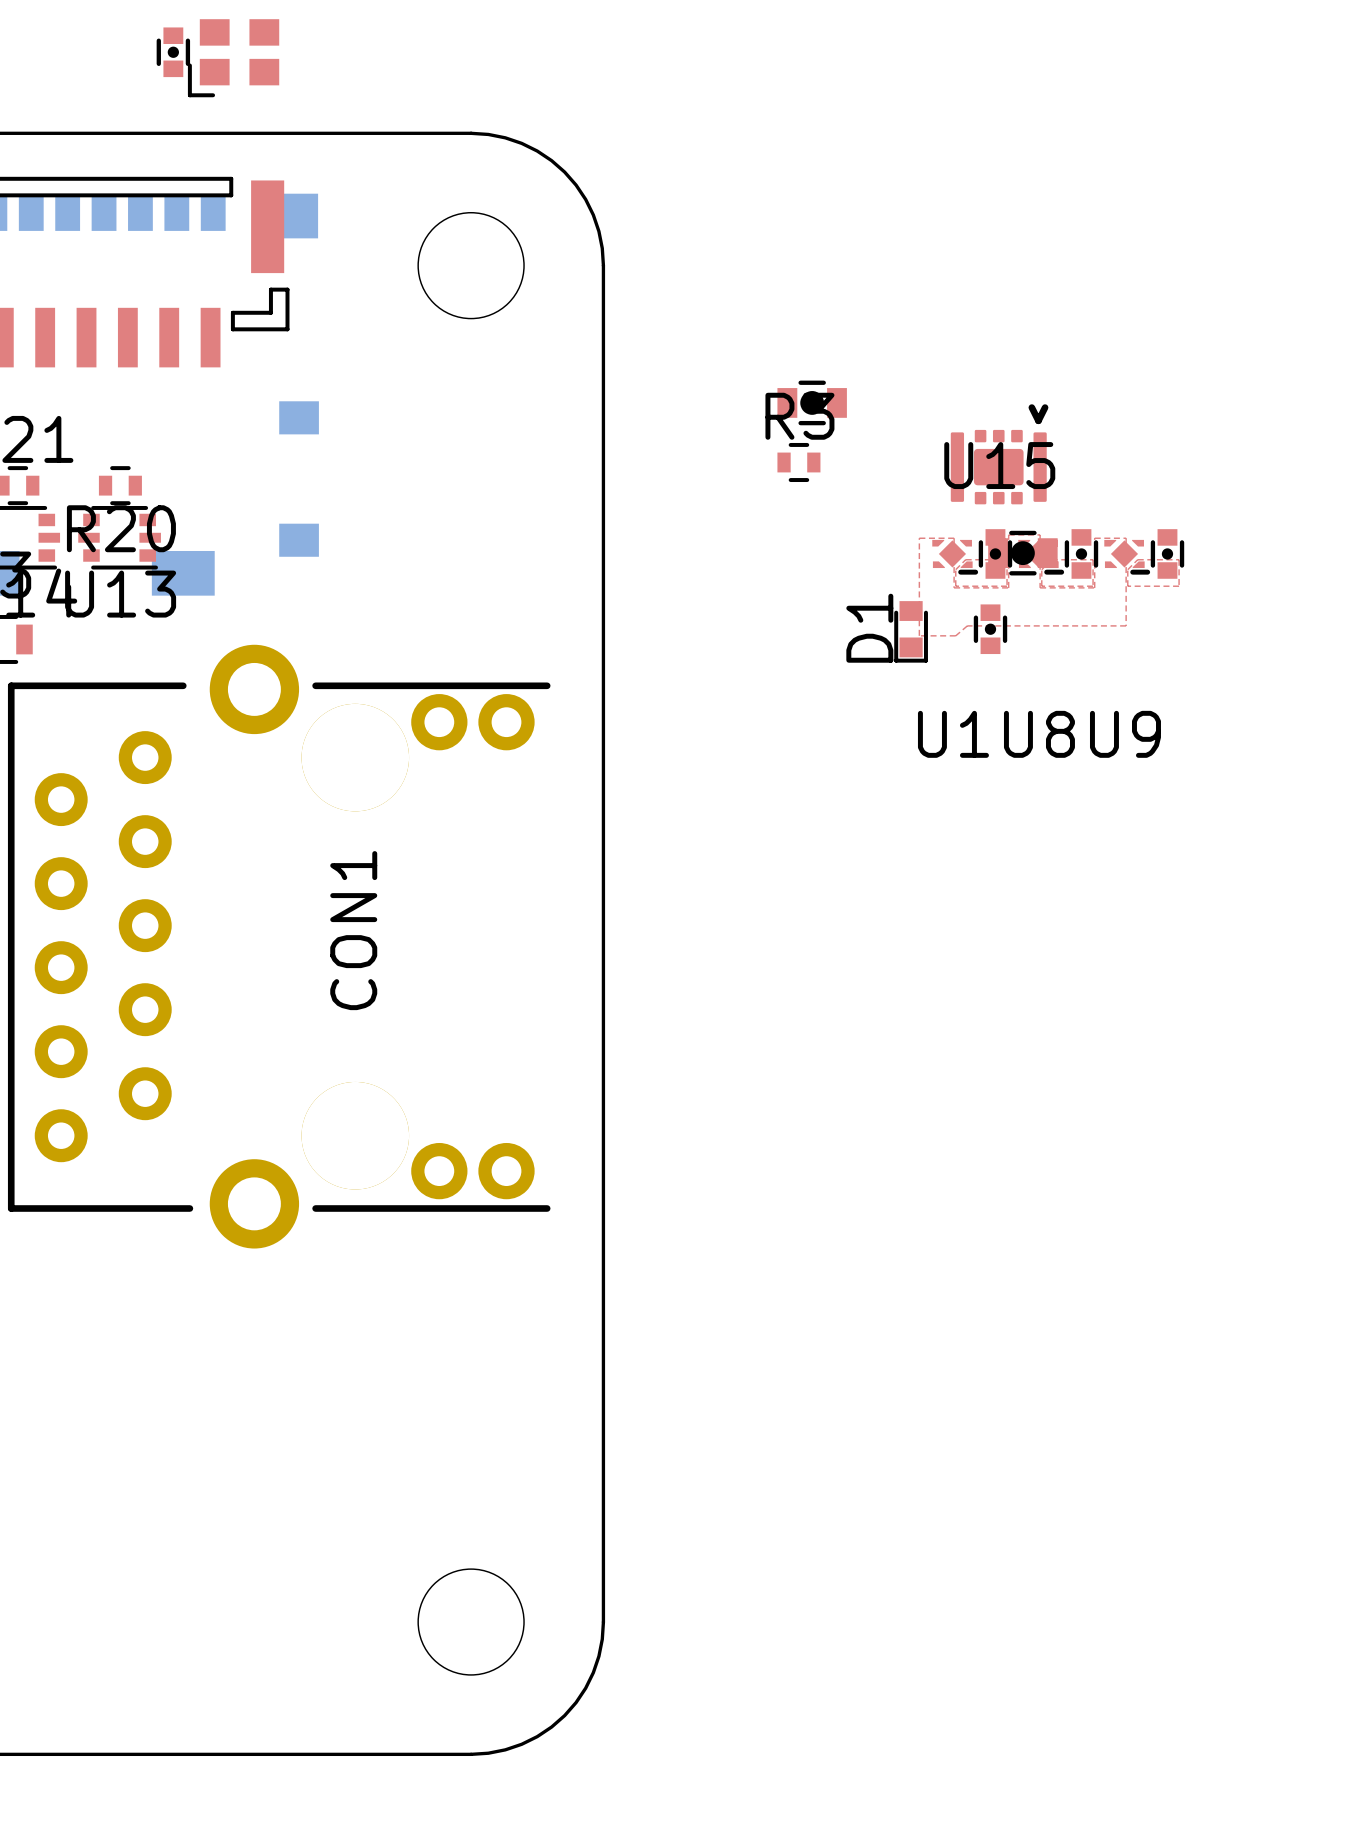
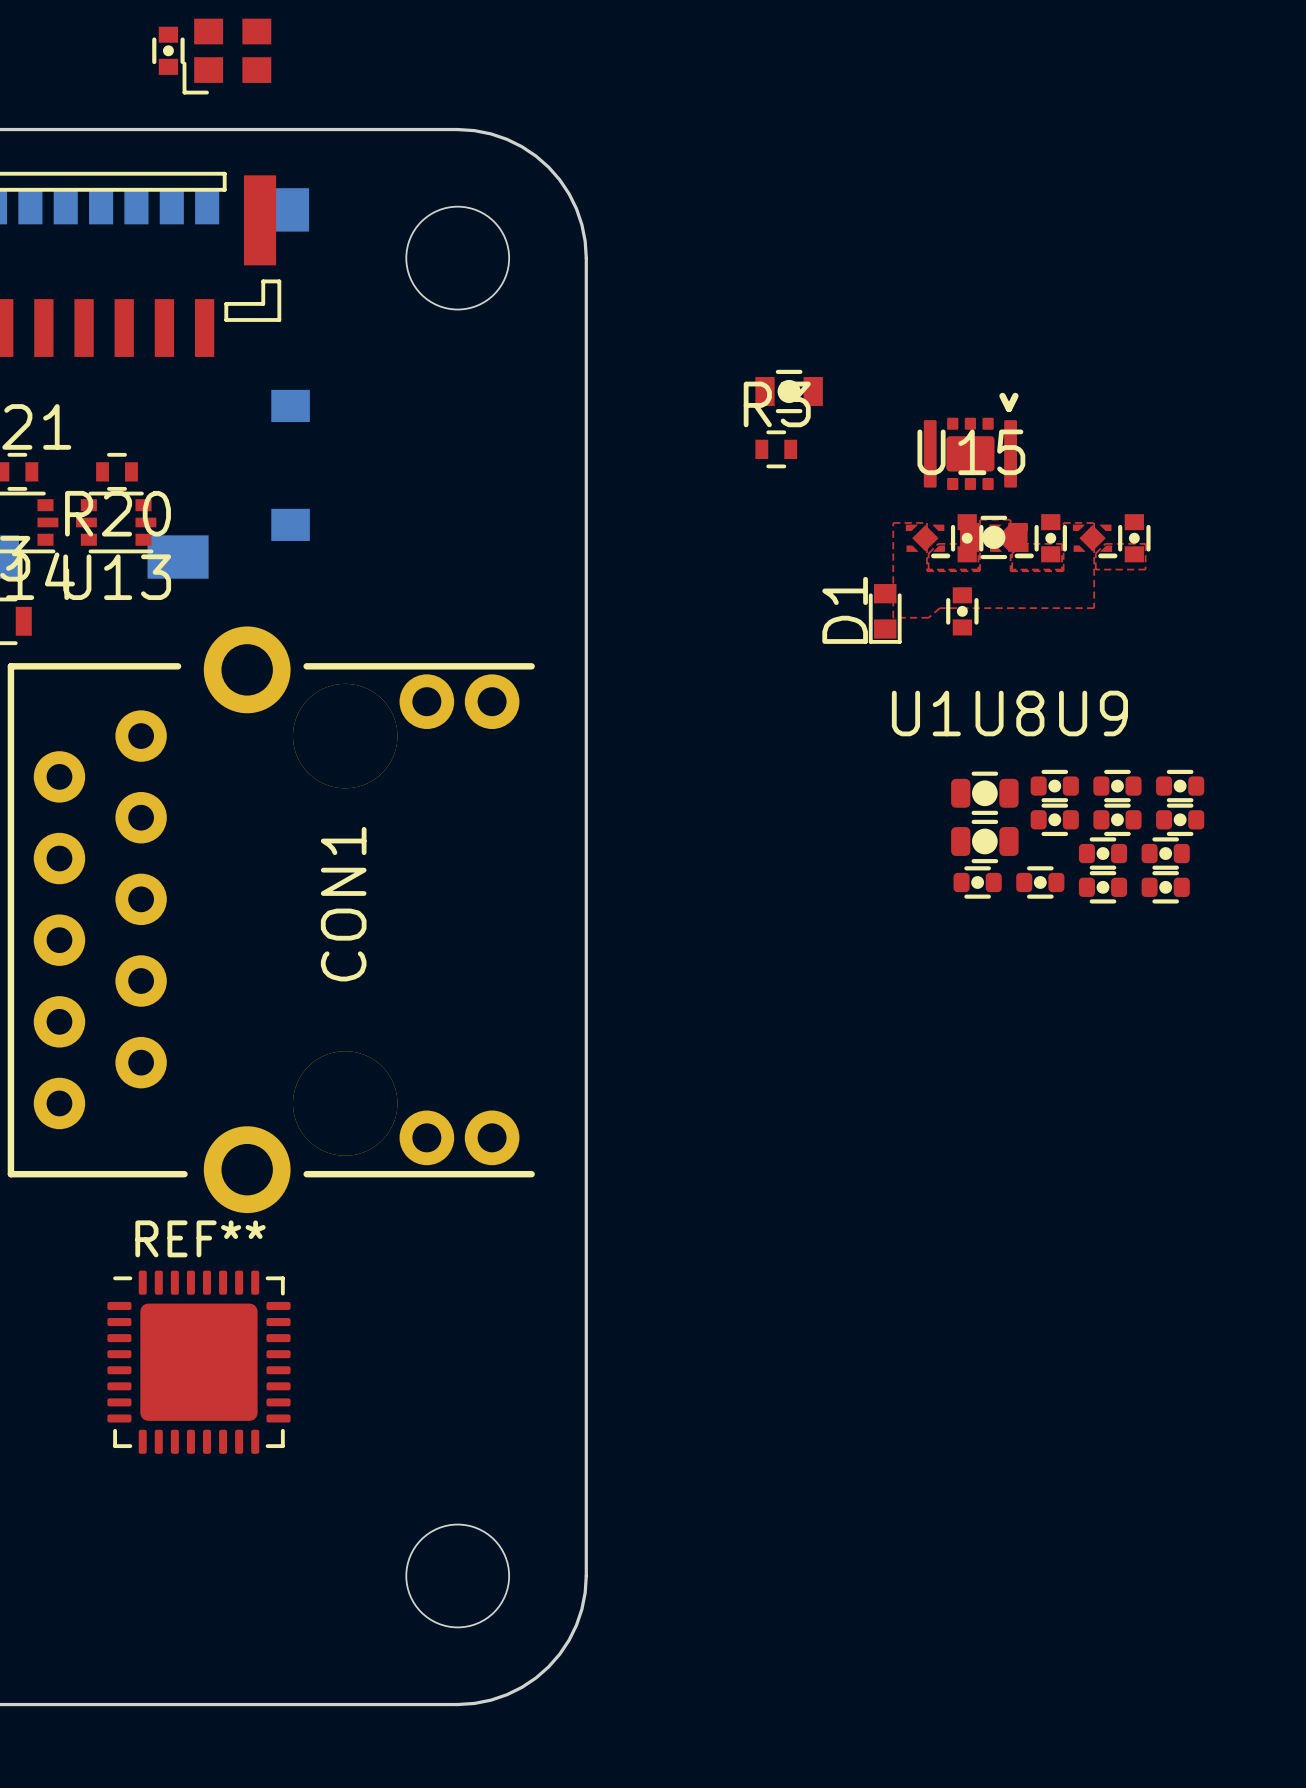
part: none -> (1054, 786)
part: none -> (1117, 786)
part: none -> (1180, 786)
part: none -> (984, 793)
part: none -> (1054, 819)
part: none -> (1117, 819)
part: none -> (1180, 819)
part: none -> (984, 841)
part: none -> (1102, 853)
part: none -> (1165, 853)
part: none -> (977, 882)
part: none -> (1040, 882)
part: none -> (1102, 887)
part: none -> (1165, 887)
REF**: none -> (198, 1362)

